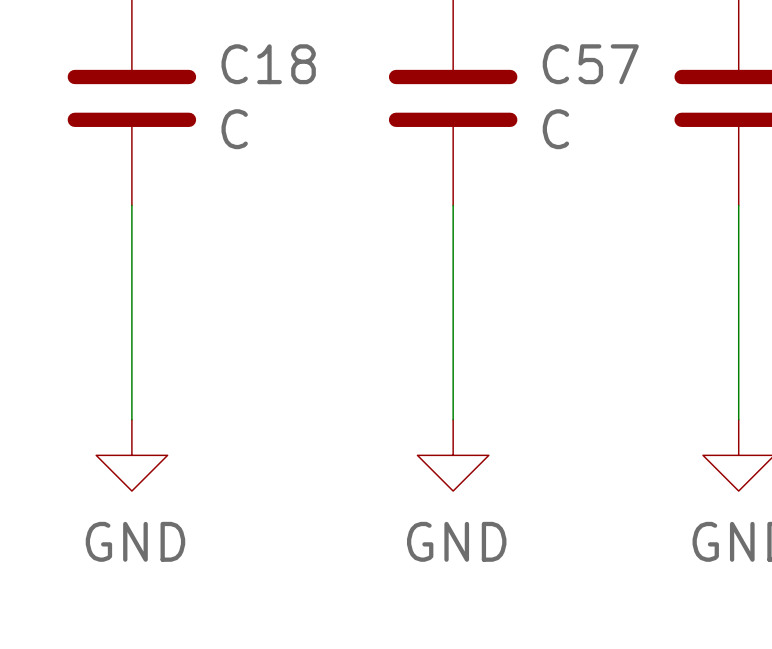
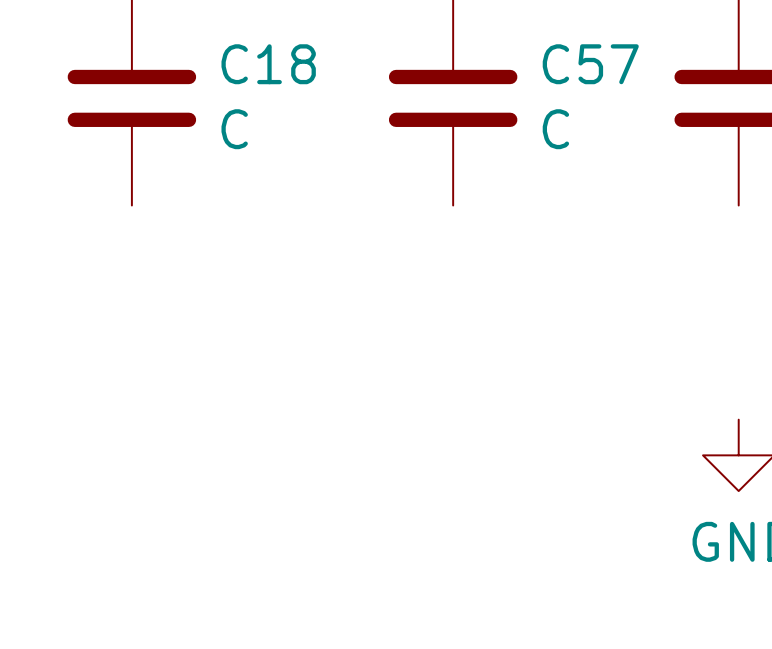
wire: (131, 205) (131, 419) -> none
wire: (453, 205) (453, 419) -> none
wire: (738, 205) (738, 419) -> none
power symbol: GND (131, 455) -> none
power symbol: GND (453, 455) -> none

